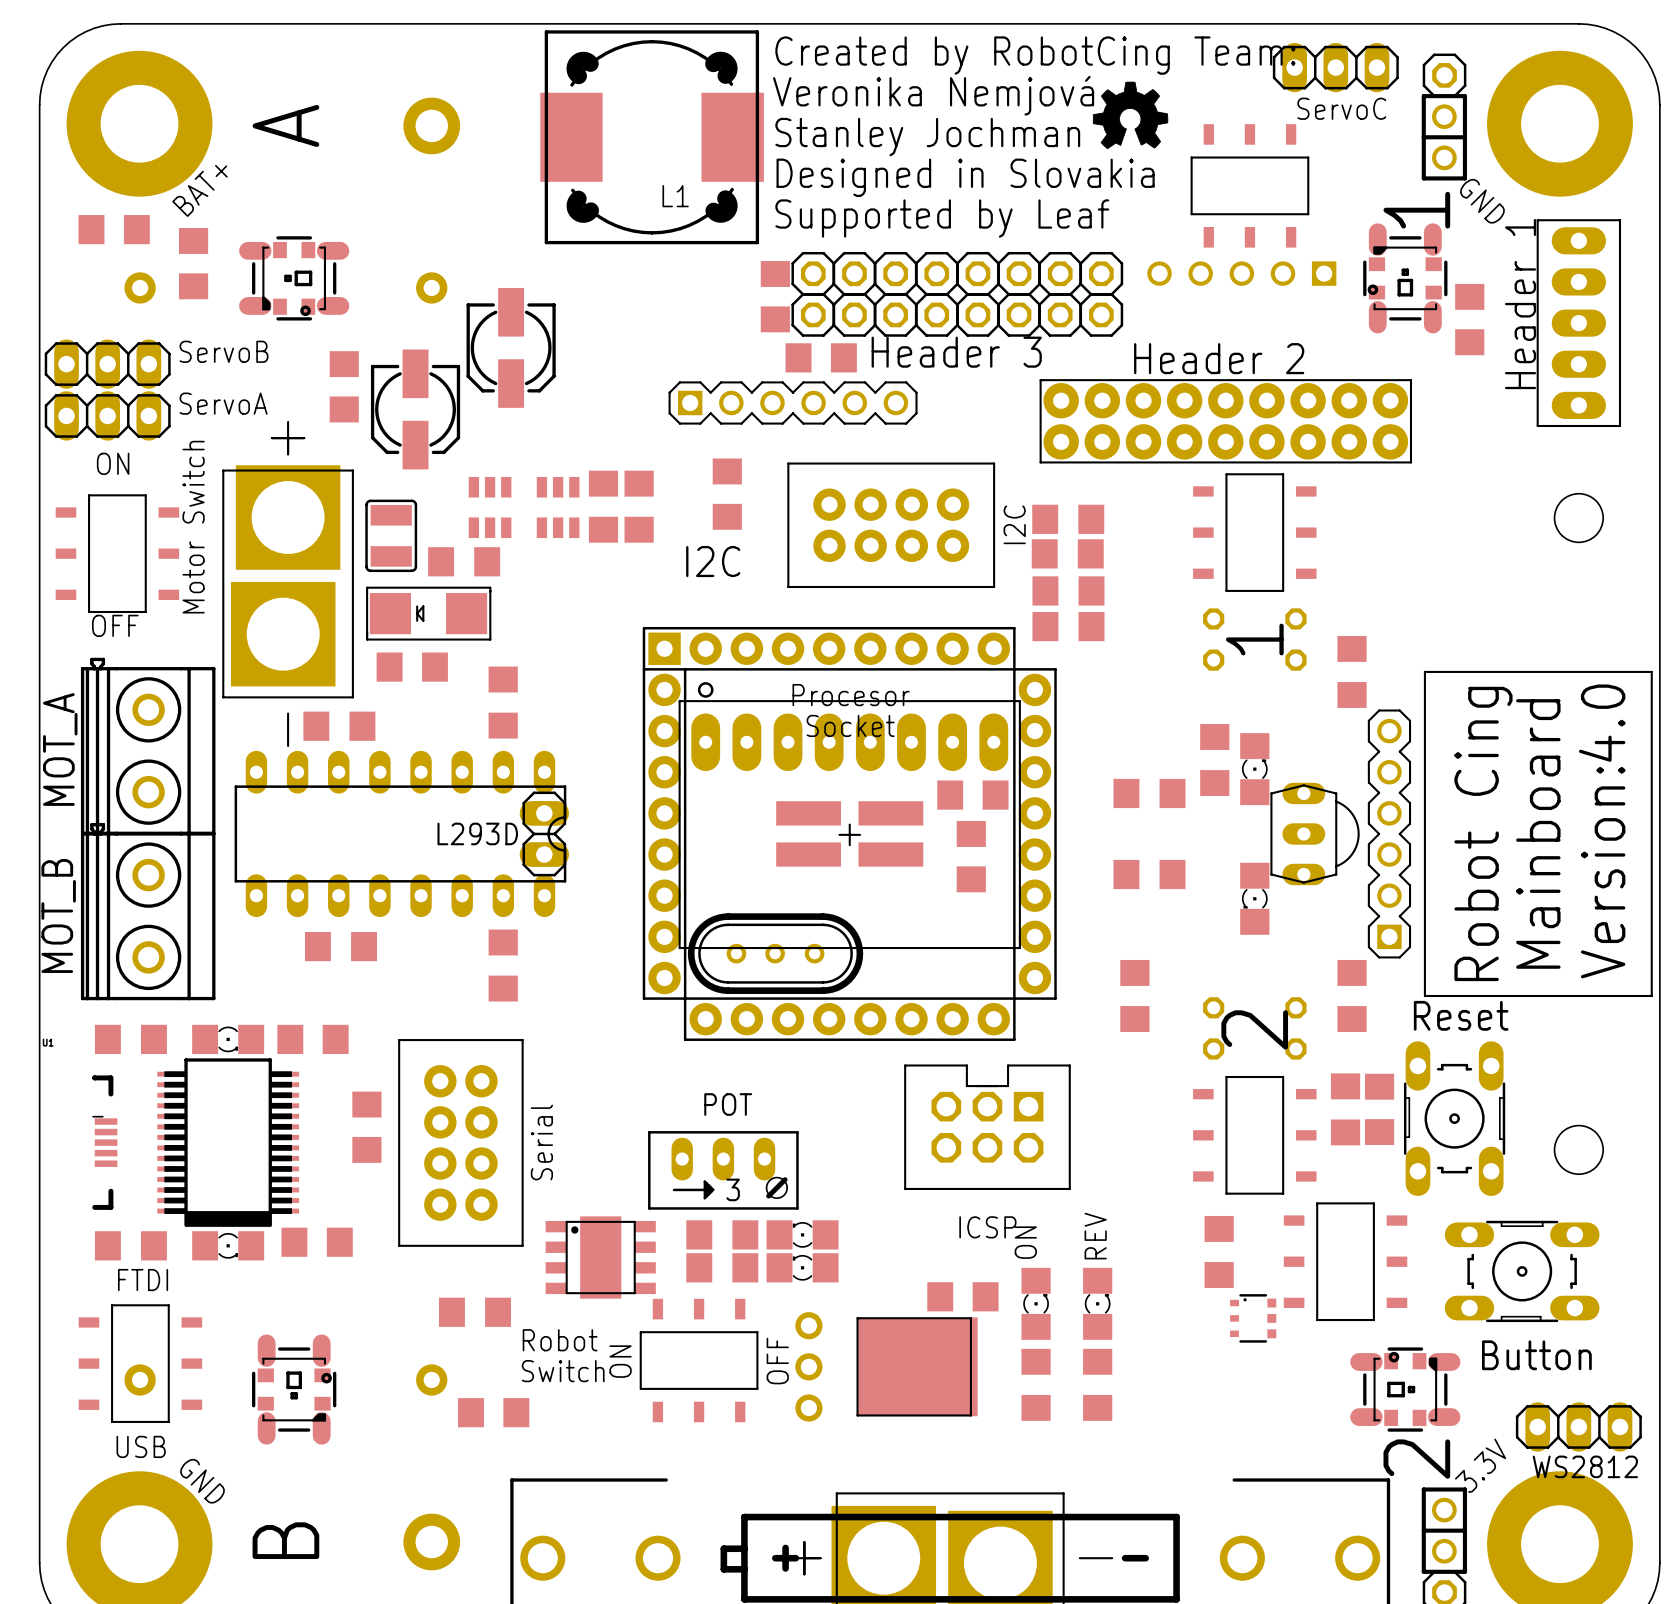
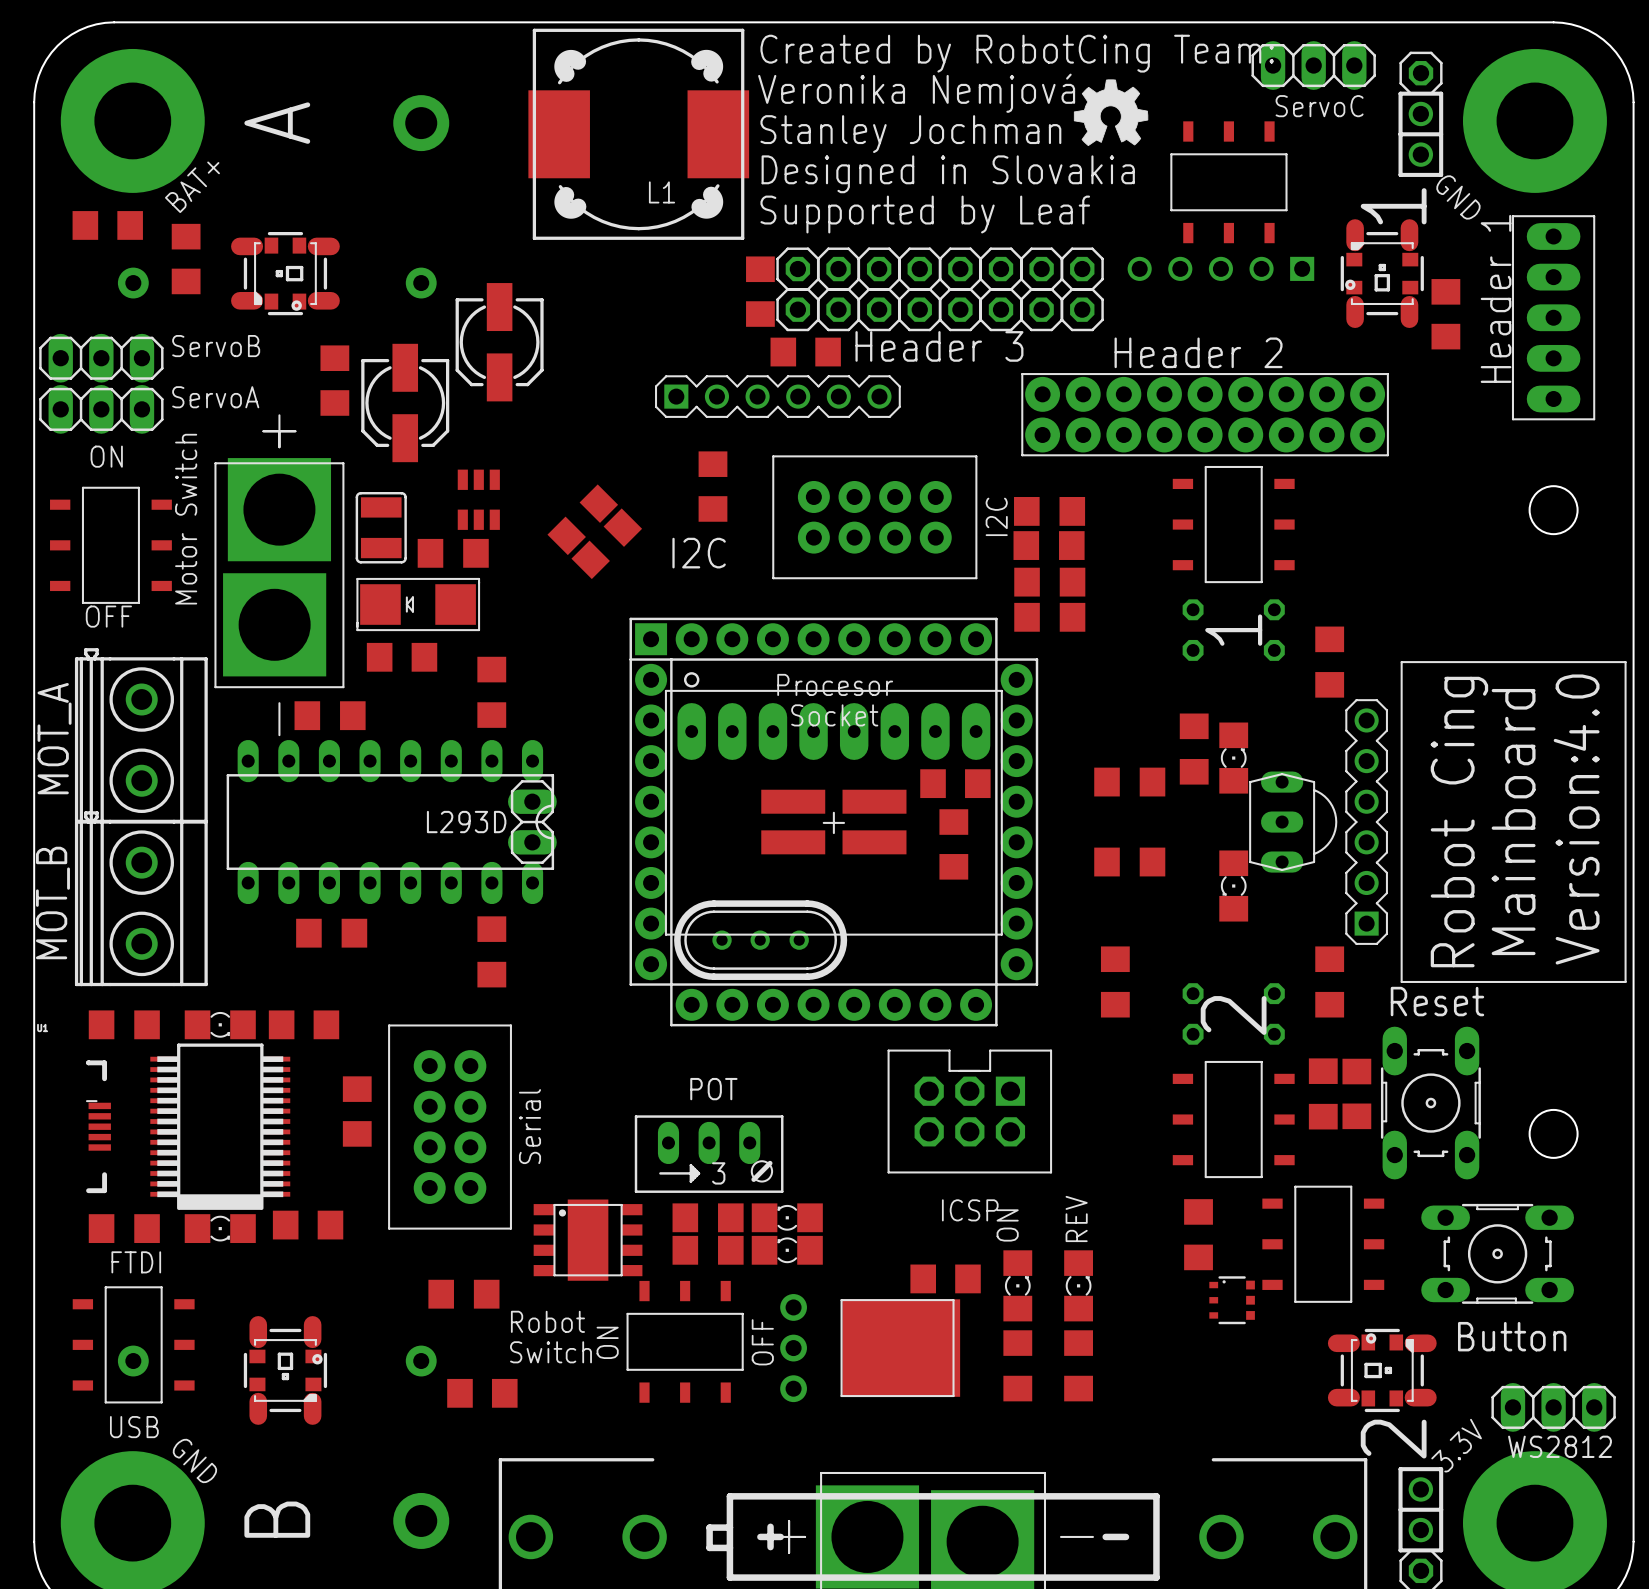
part: (603, 506) -> none
part: (639, 506) -> none
part: (558, 507) -> none
part: none -> (582, 519)
part: none -> (606, 543)

